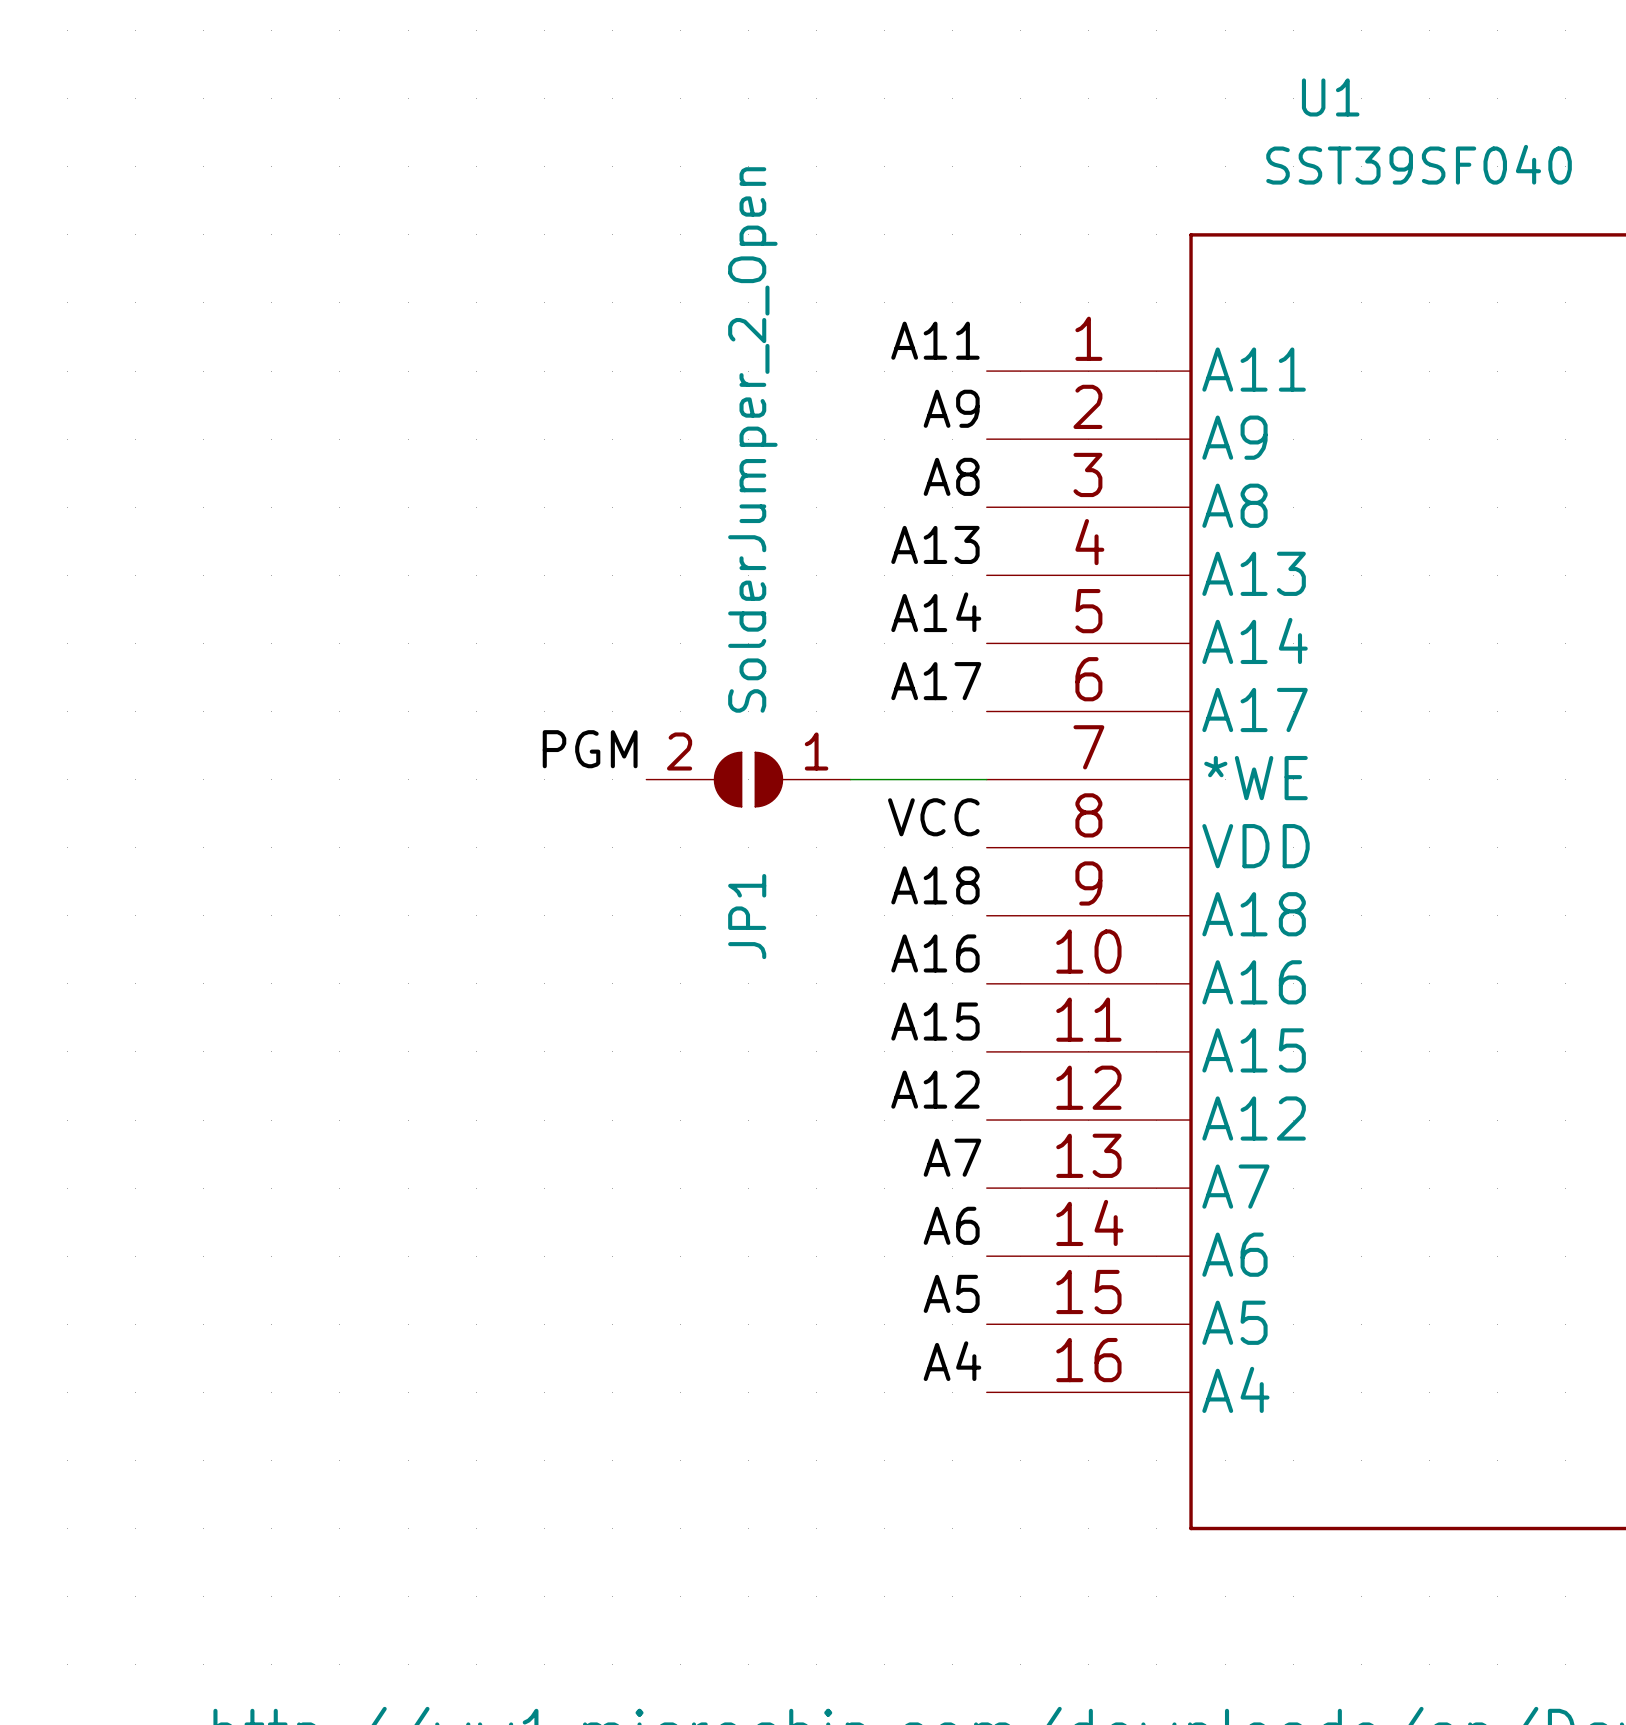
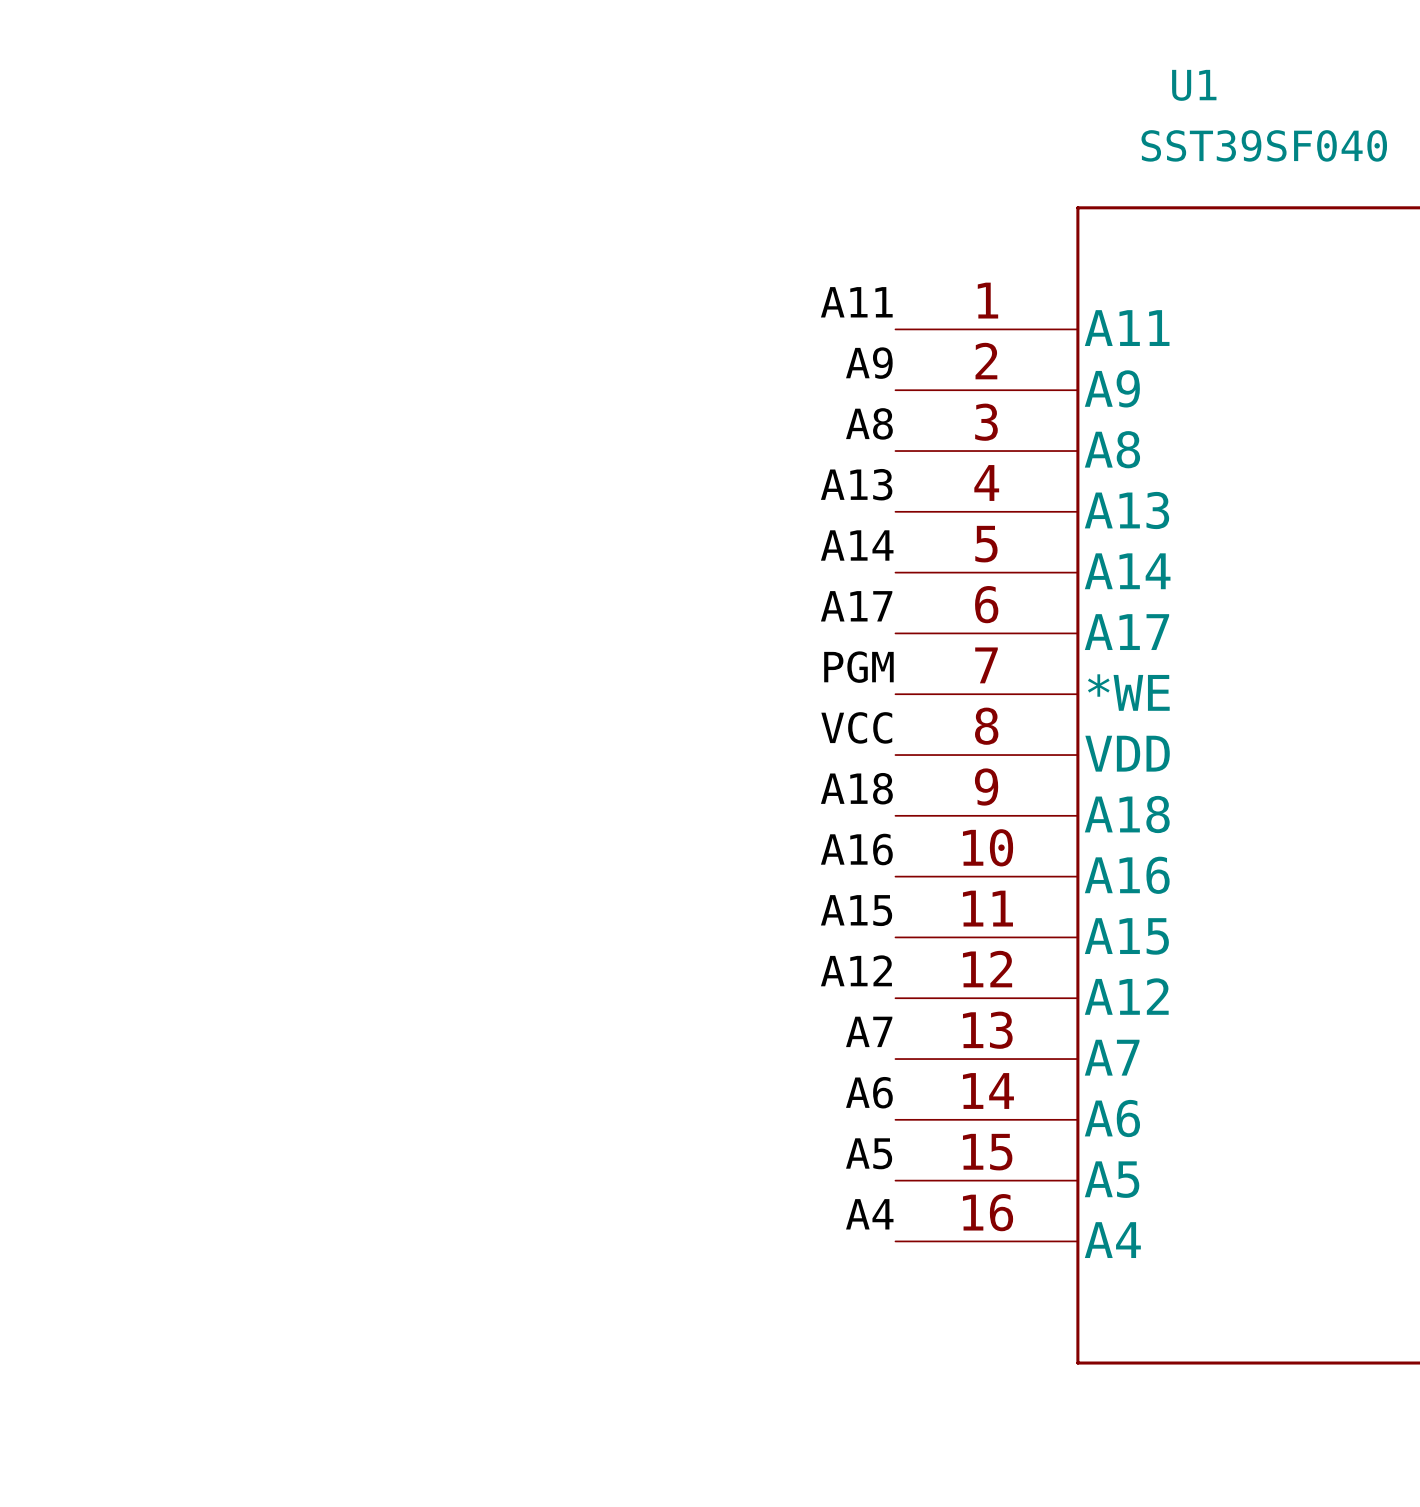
label position: PGM (590, 749) -> PGM (858, 667)
JP1: SolderJumper_2_Open (748, 779) -> none
wire: (850, 779) (986, 779) -> none

